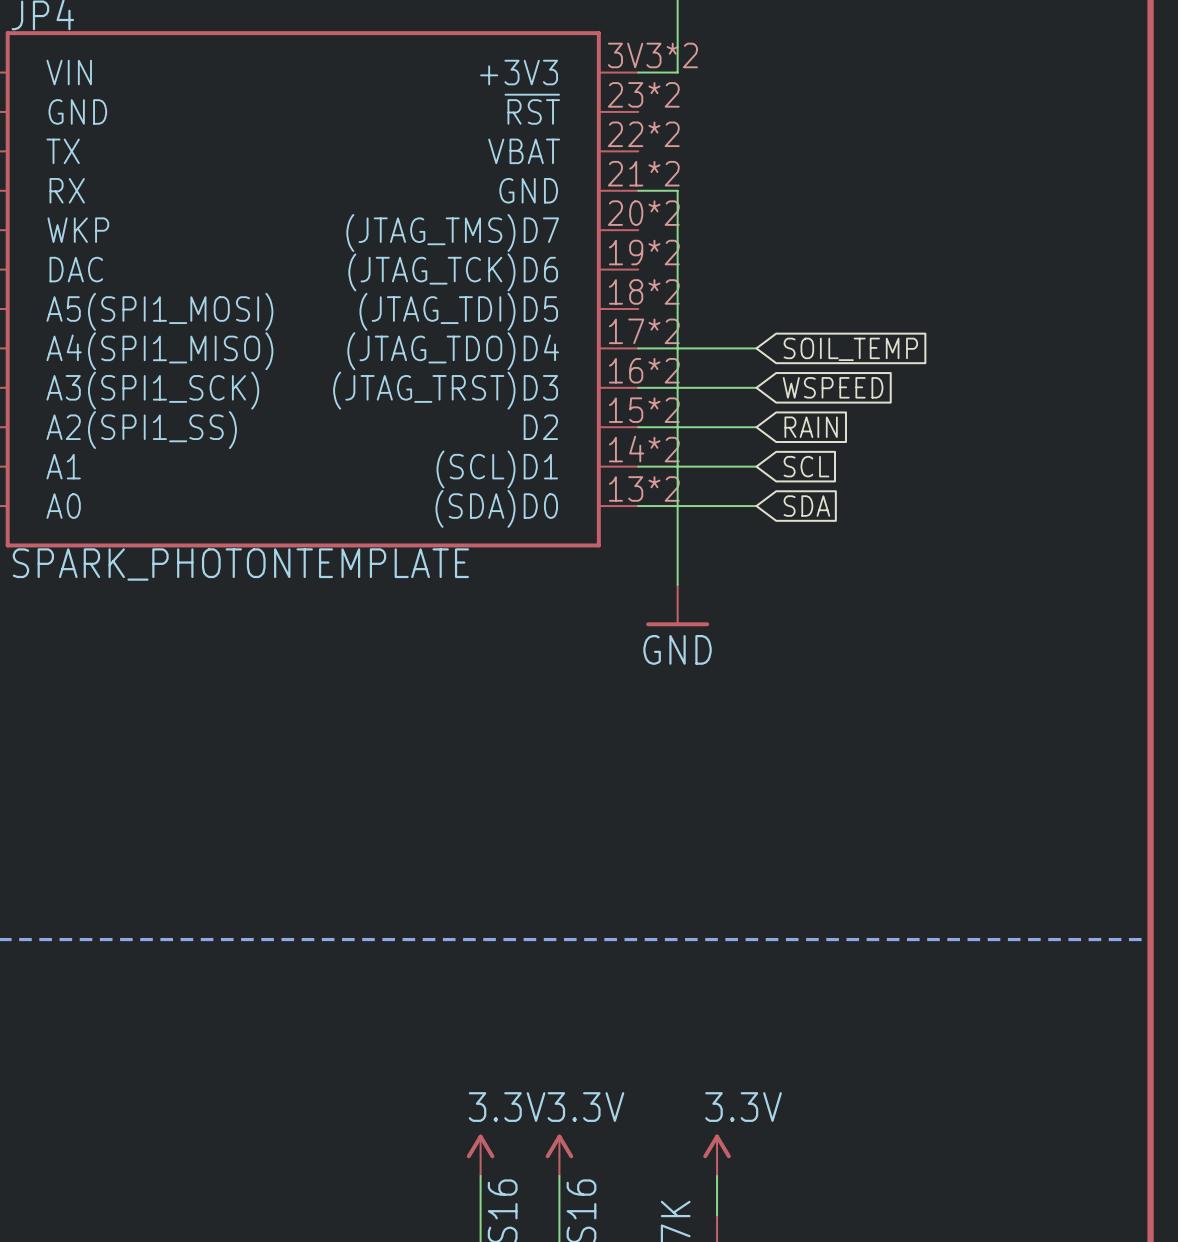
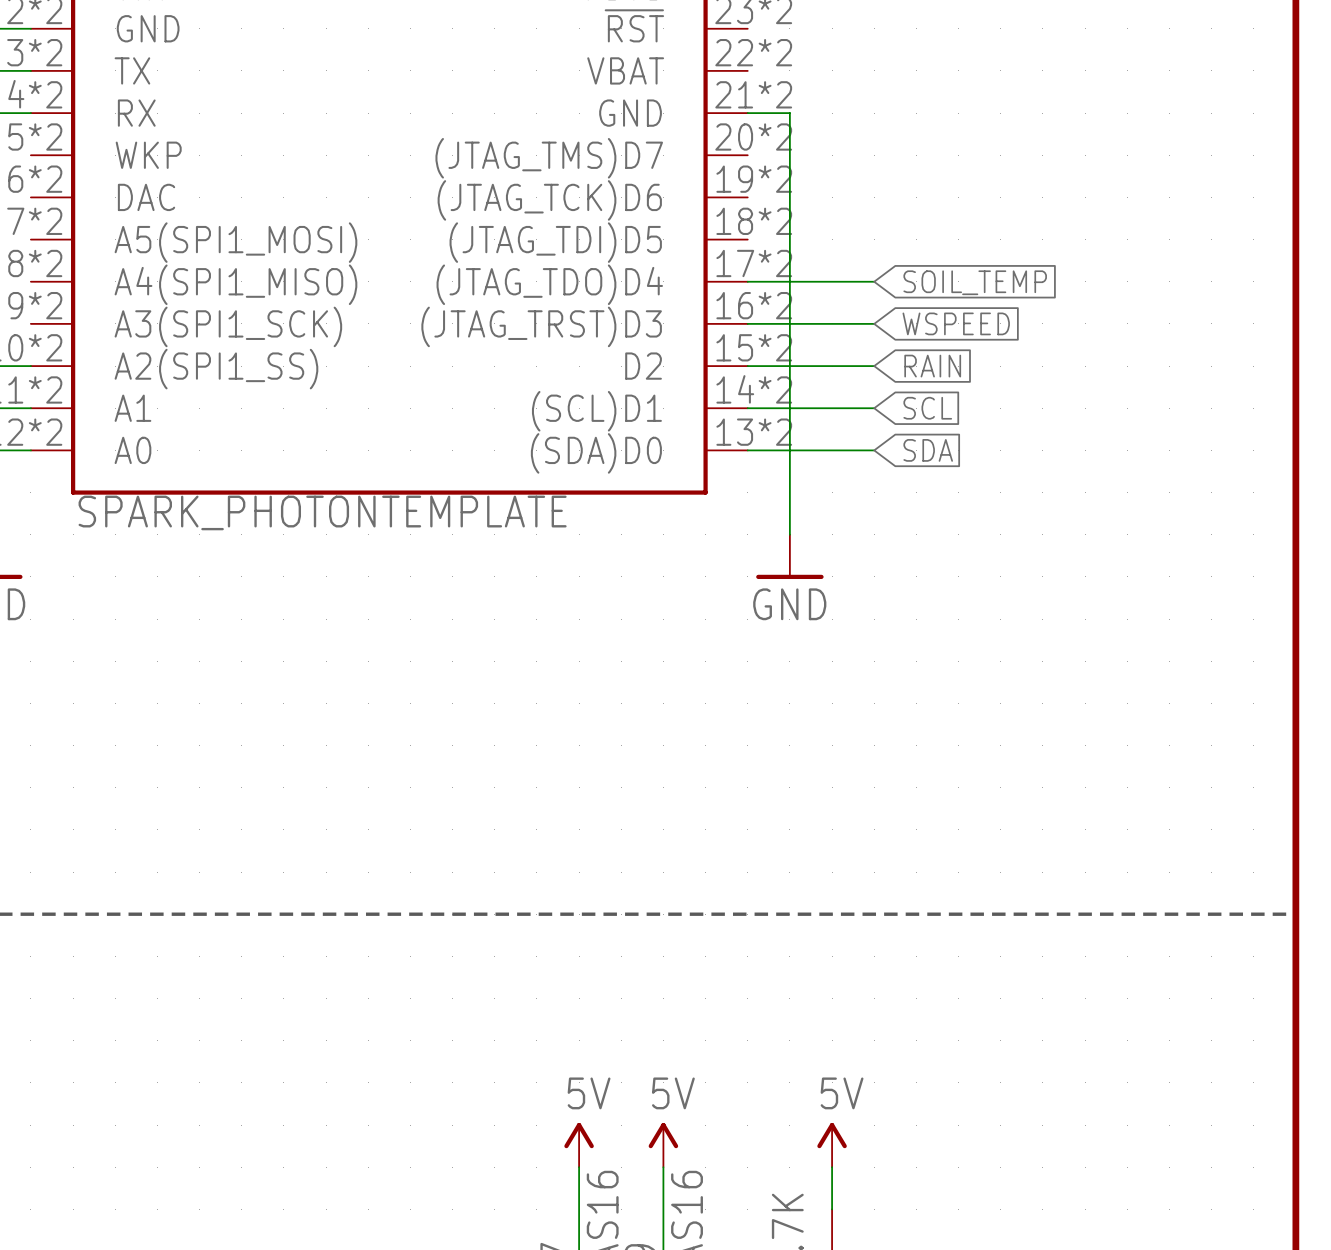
power symbol: 3.3V (480, 1155) -> 5V (579, 1145)
power symbol: 3.3V (559, 1155) -> 5V (663, 1145)
power symbol: 3.3V (717, 1155) -> 5V (832, 1145)

